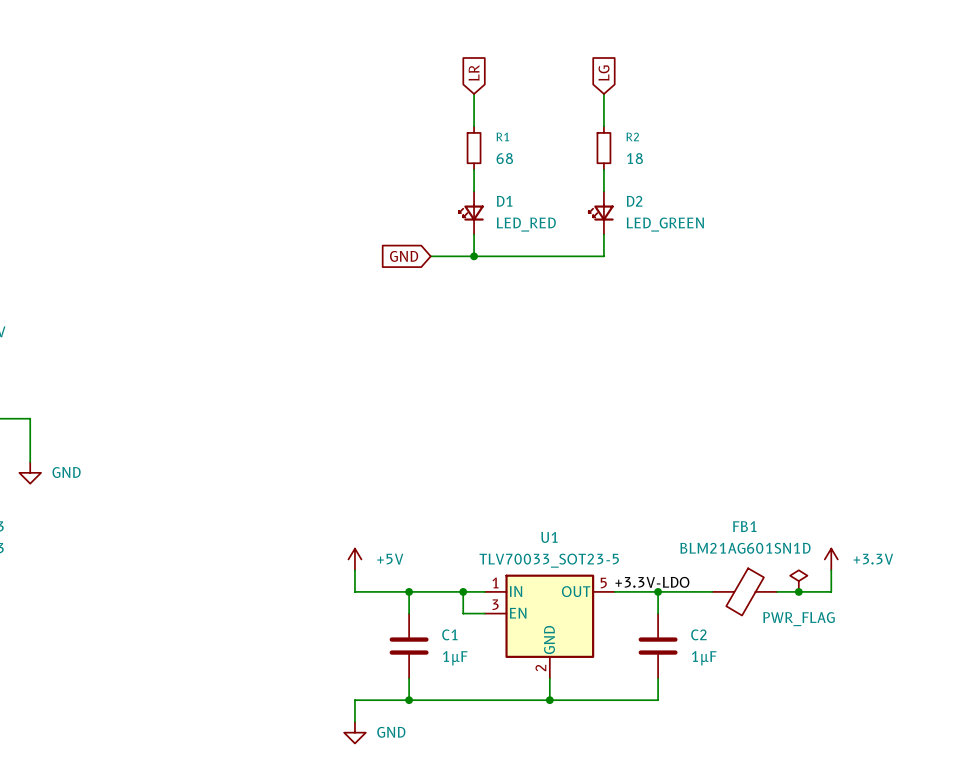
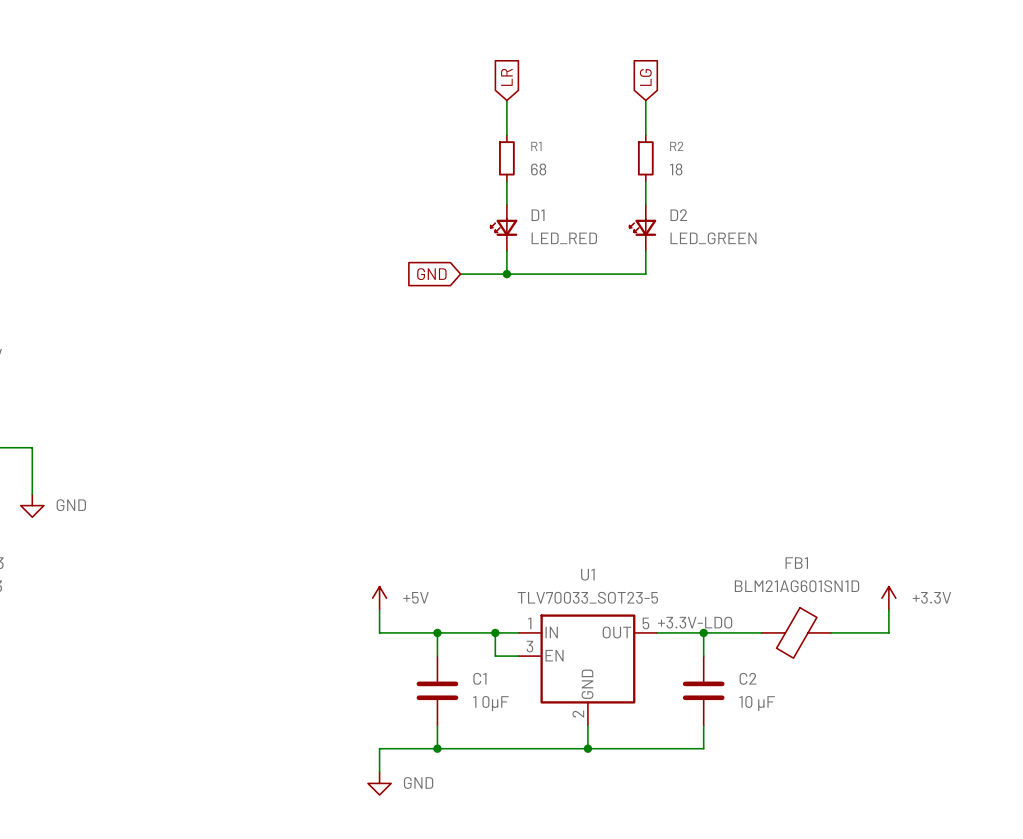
power symbol: PWR_FLAG (798, 581) -> none
junction: (798, 591) -> none
C1 value: 1µF (455, 658) -> 1 0µF (490, 703)
C2 value: 1µF (704, 658) -> 10 µF (757, 703)

